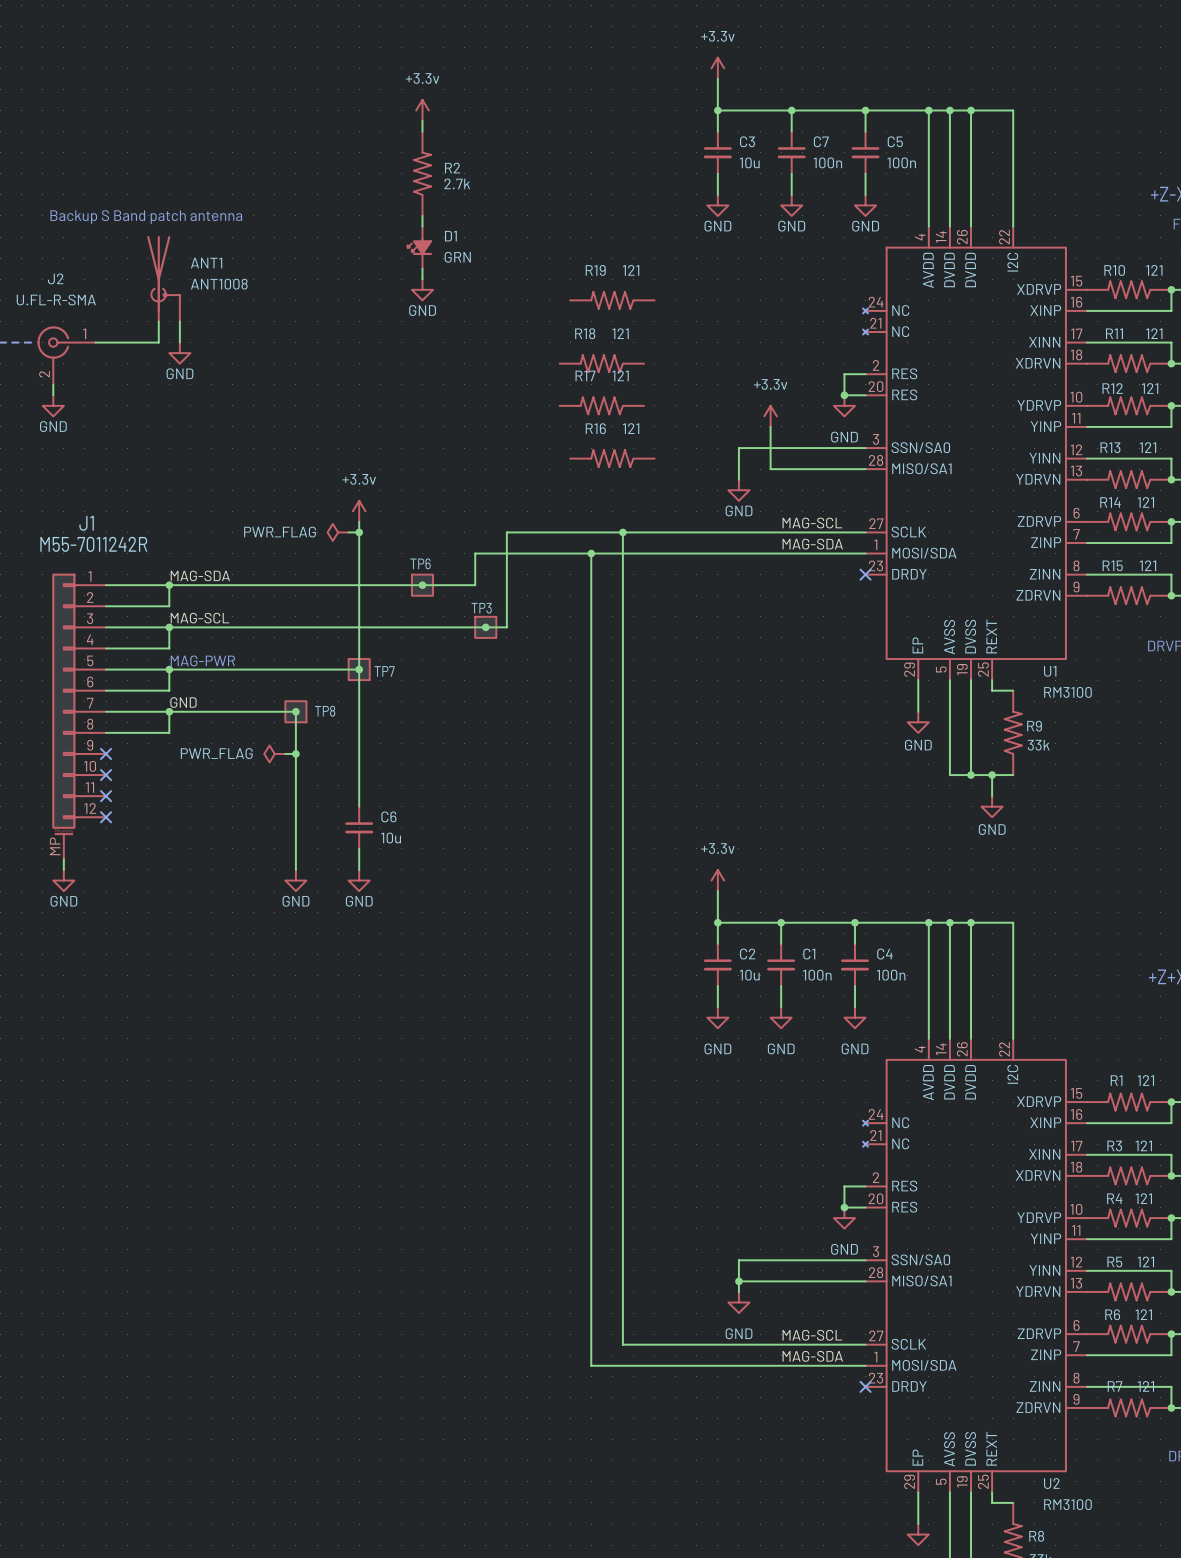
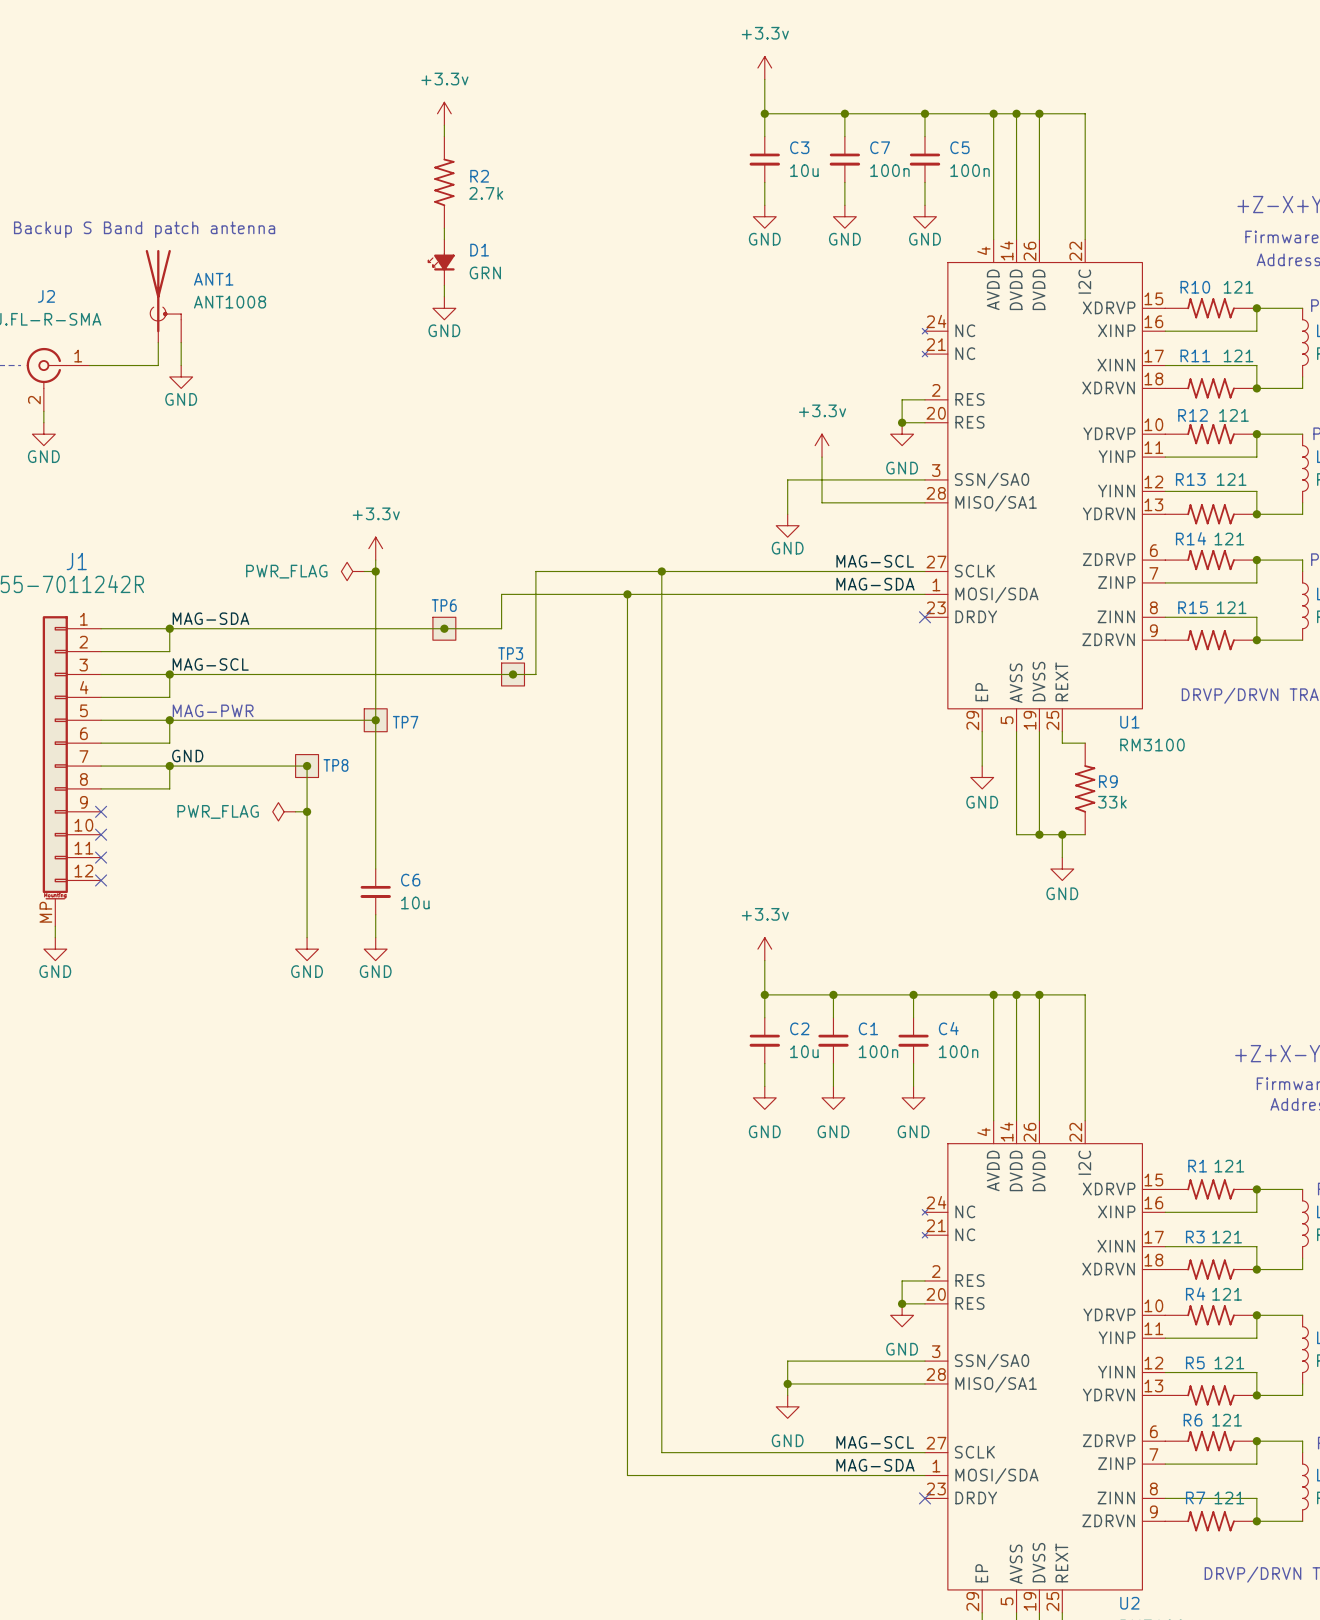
R19: 121 (612, 300) -> none
R18: 121 (601, 363) -> none
R17: 121 (601, 405) -> none
R16: 121 (612, 458) -> none

